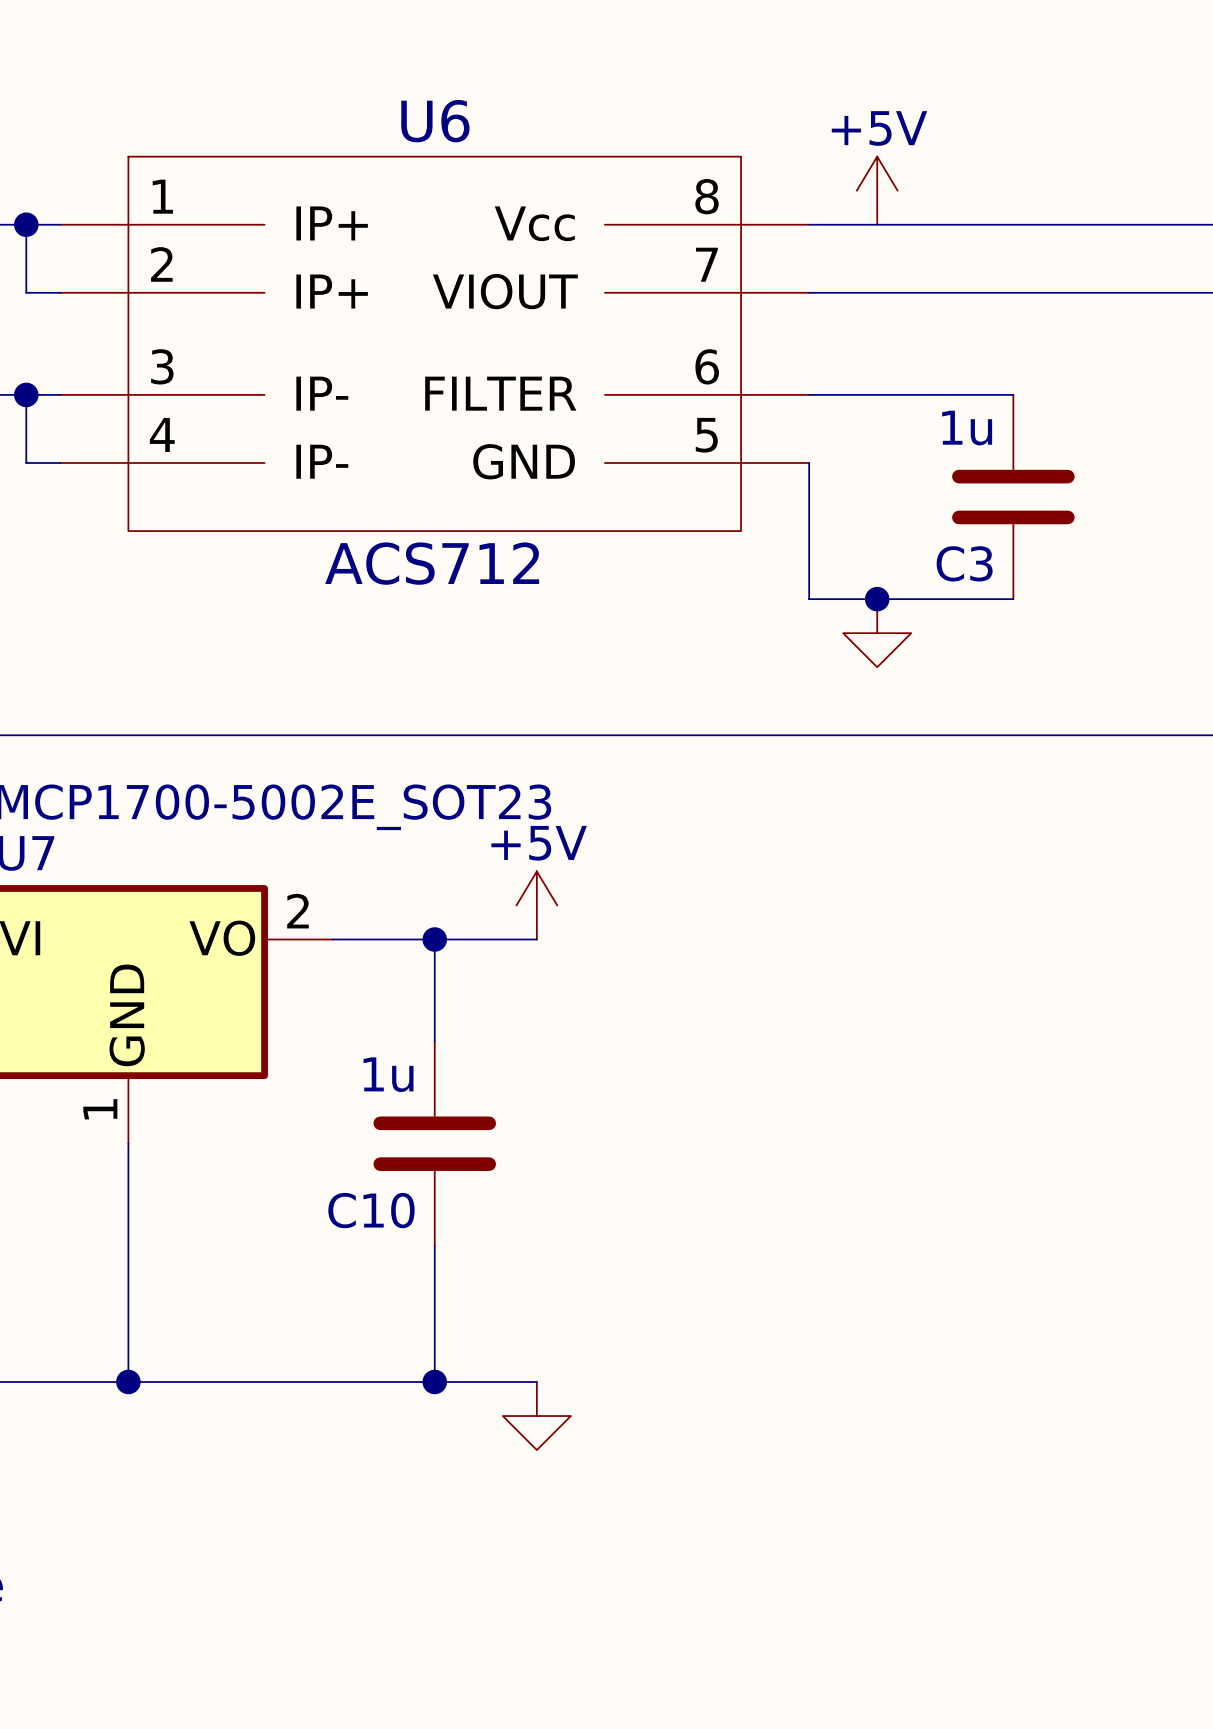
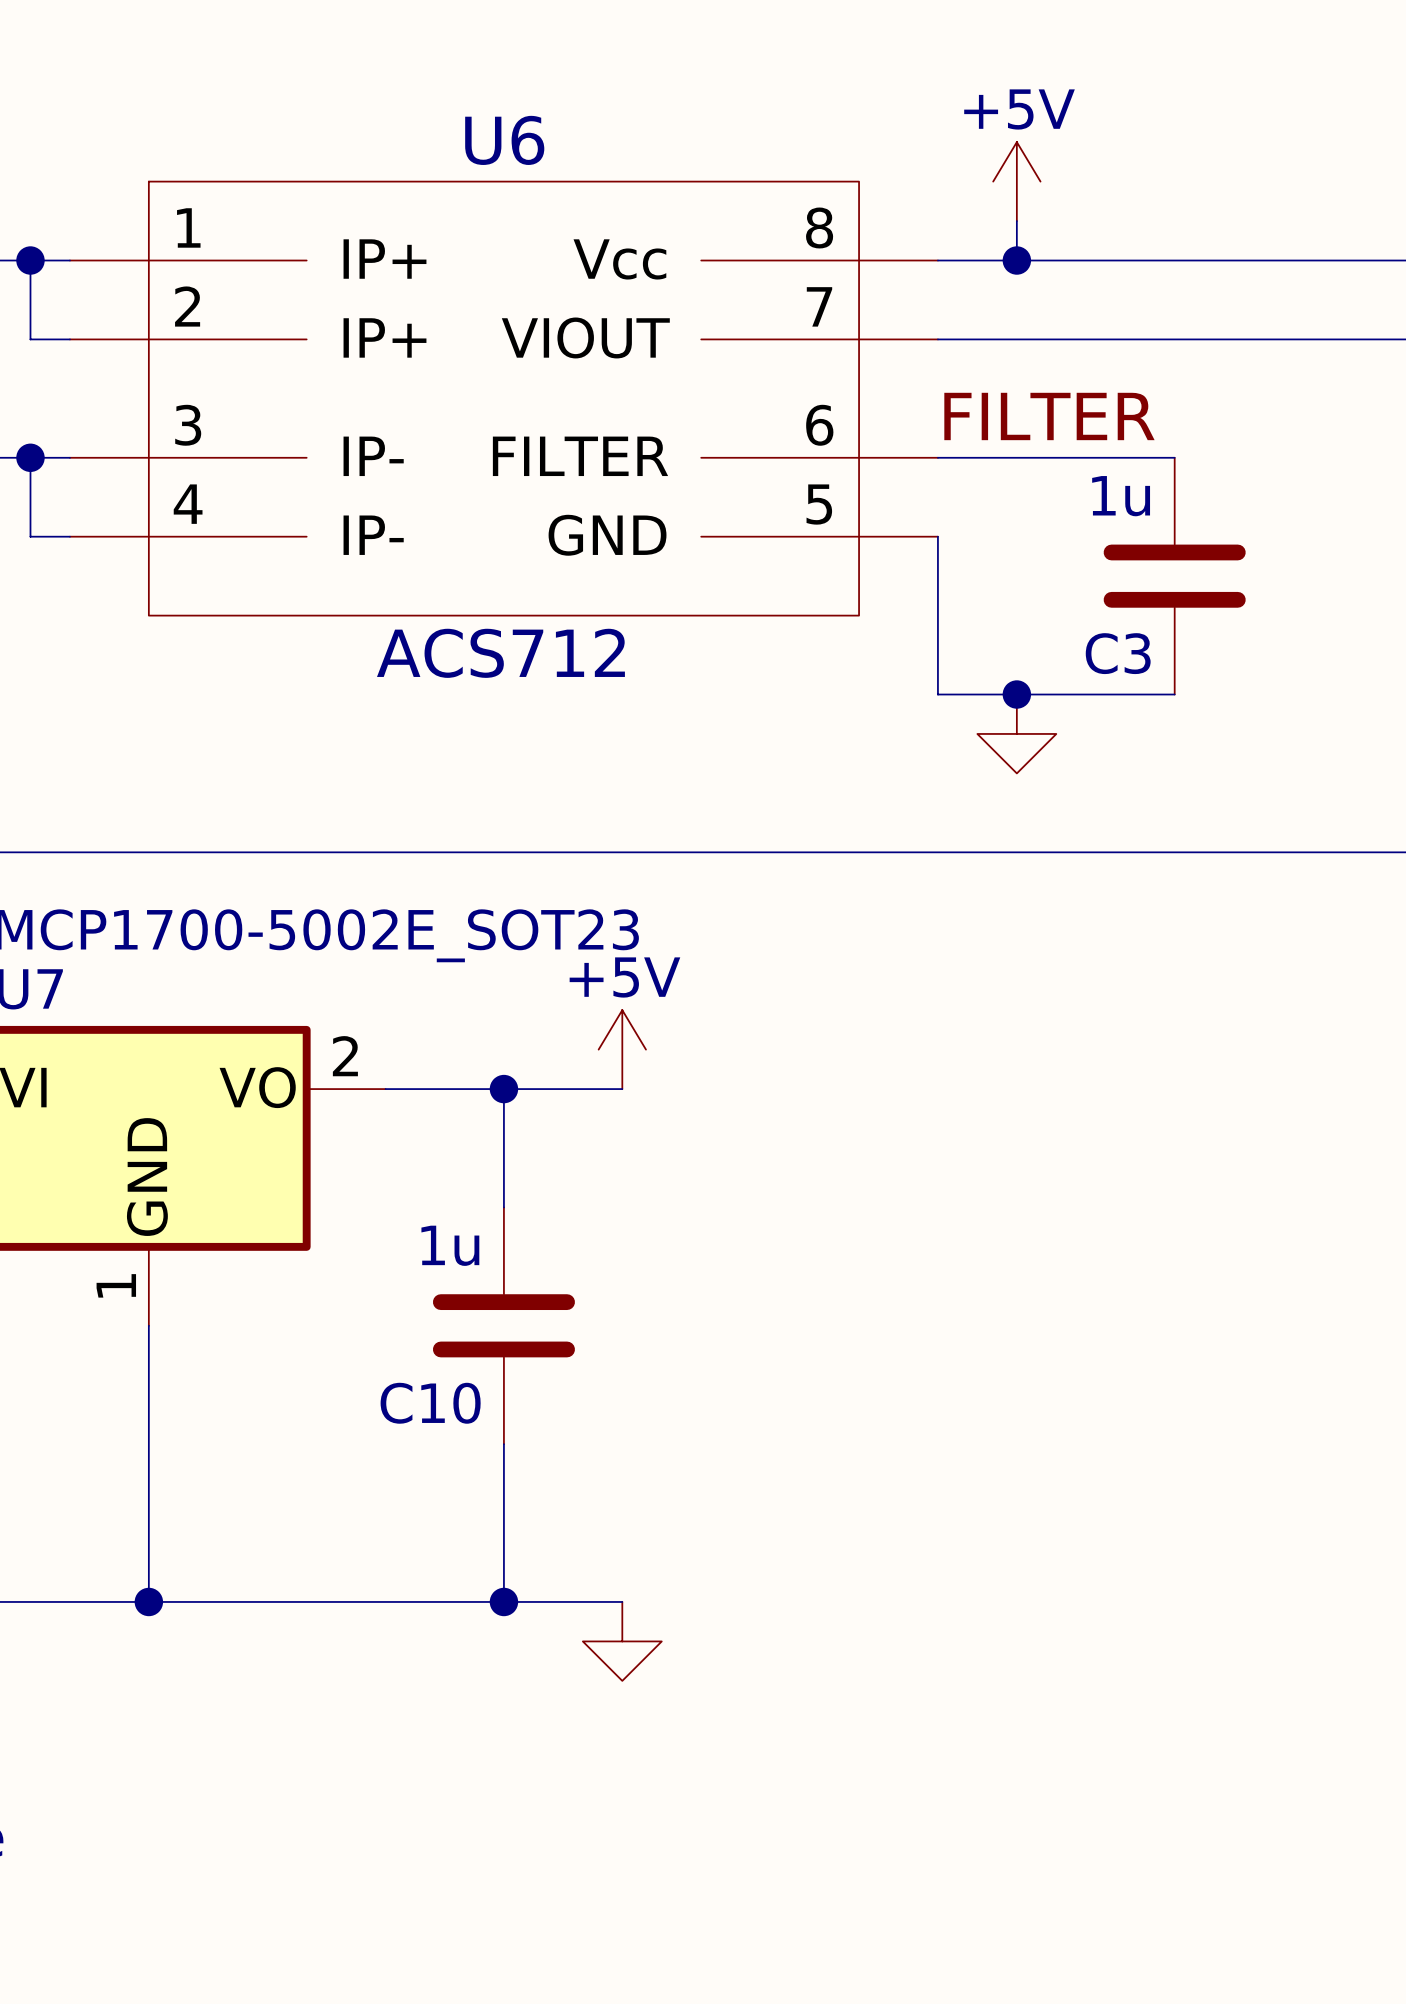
power symbol position: +5V (877, 190) -> +5V (1016, 181)
junction: none -> (1016, 260)
label: none -> FILTER (1049, 416)

